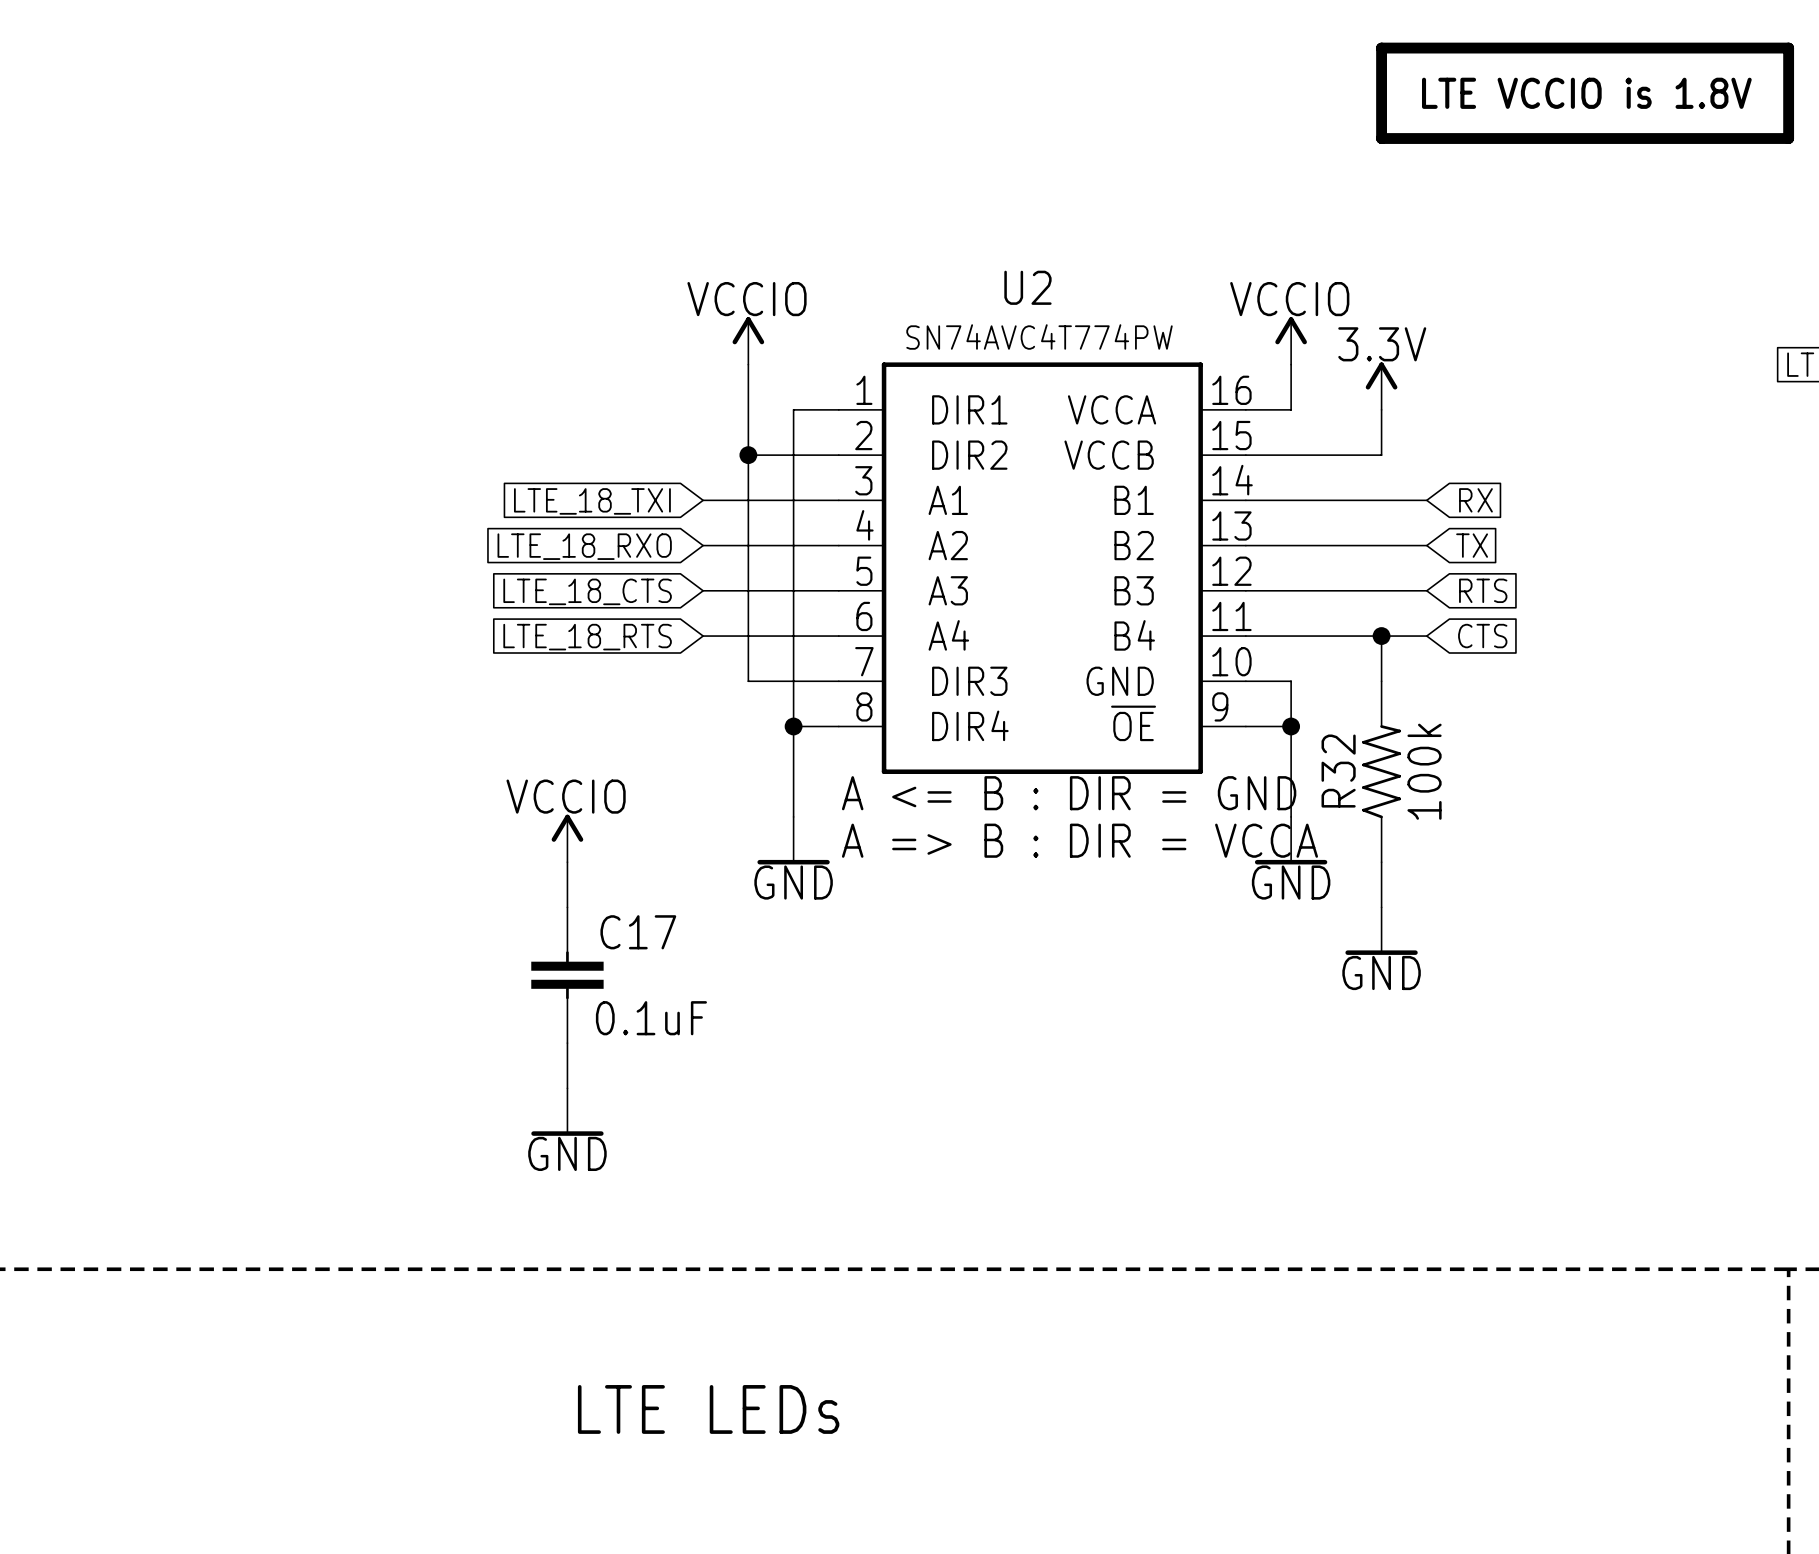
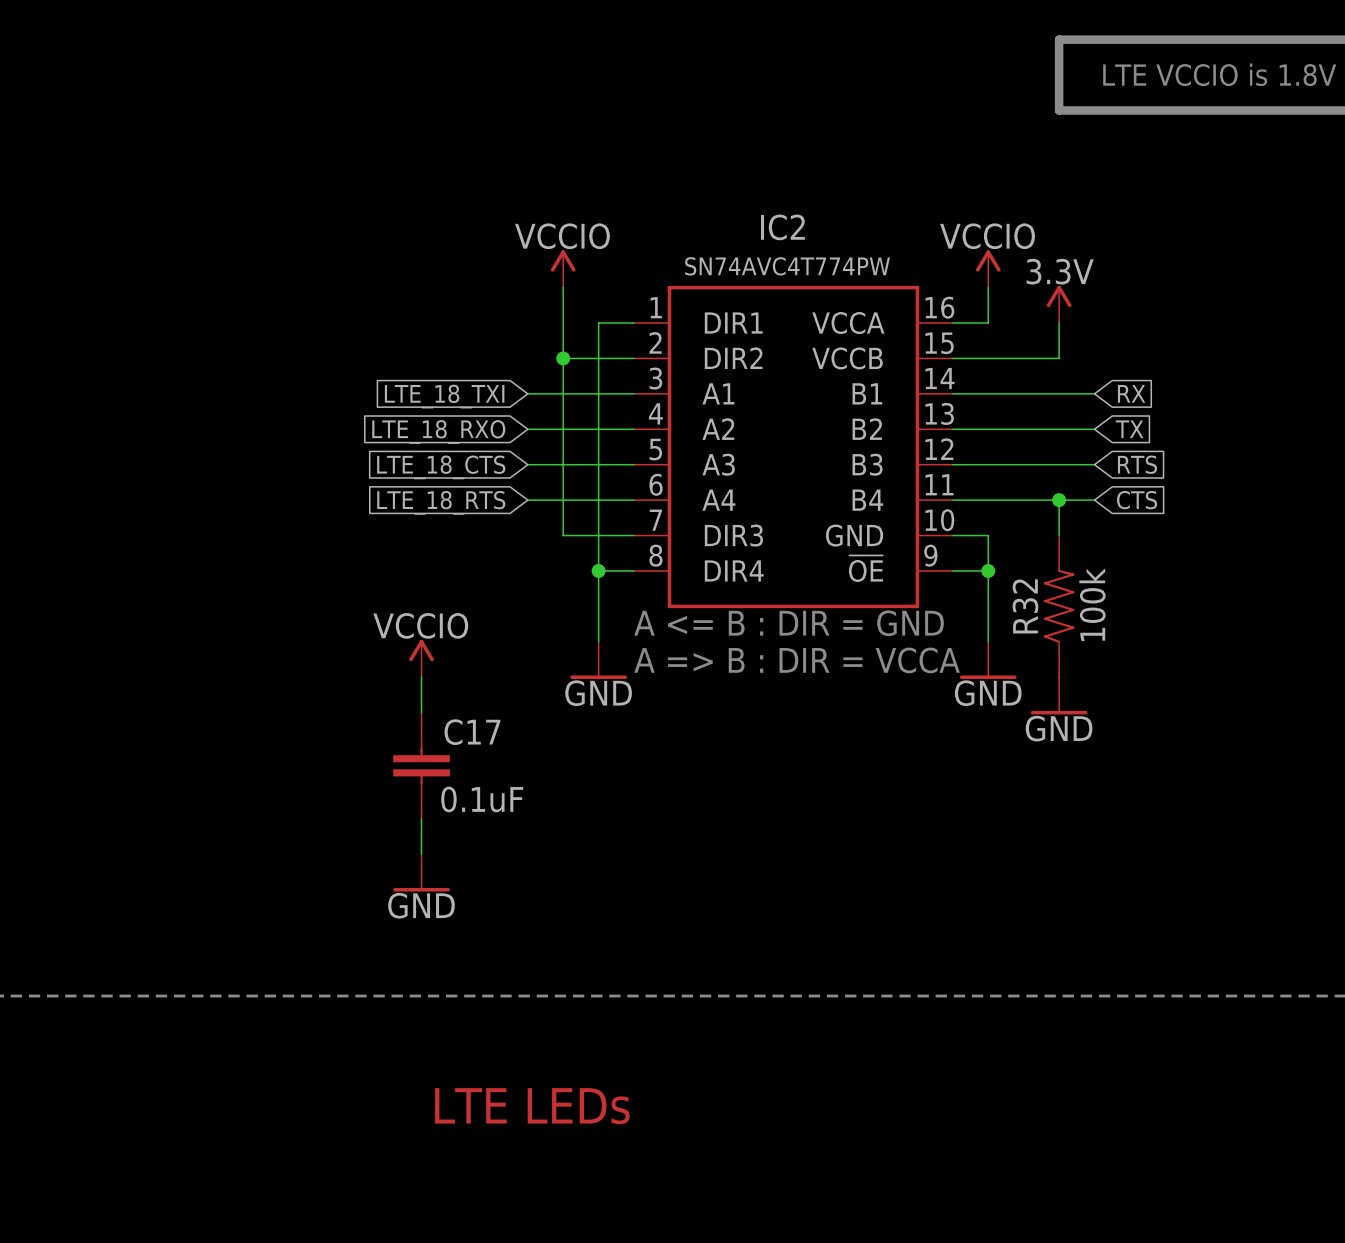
U2 name: U2 (1027, 287) -> IC2 (782, 227)
power symbol position: GND (1381, 931) -> GND (1059, 695)

